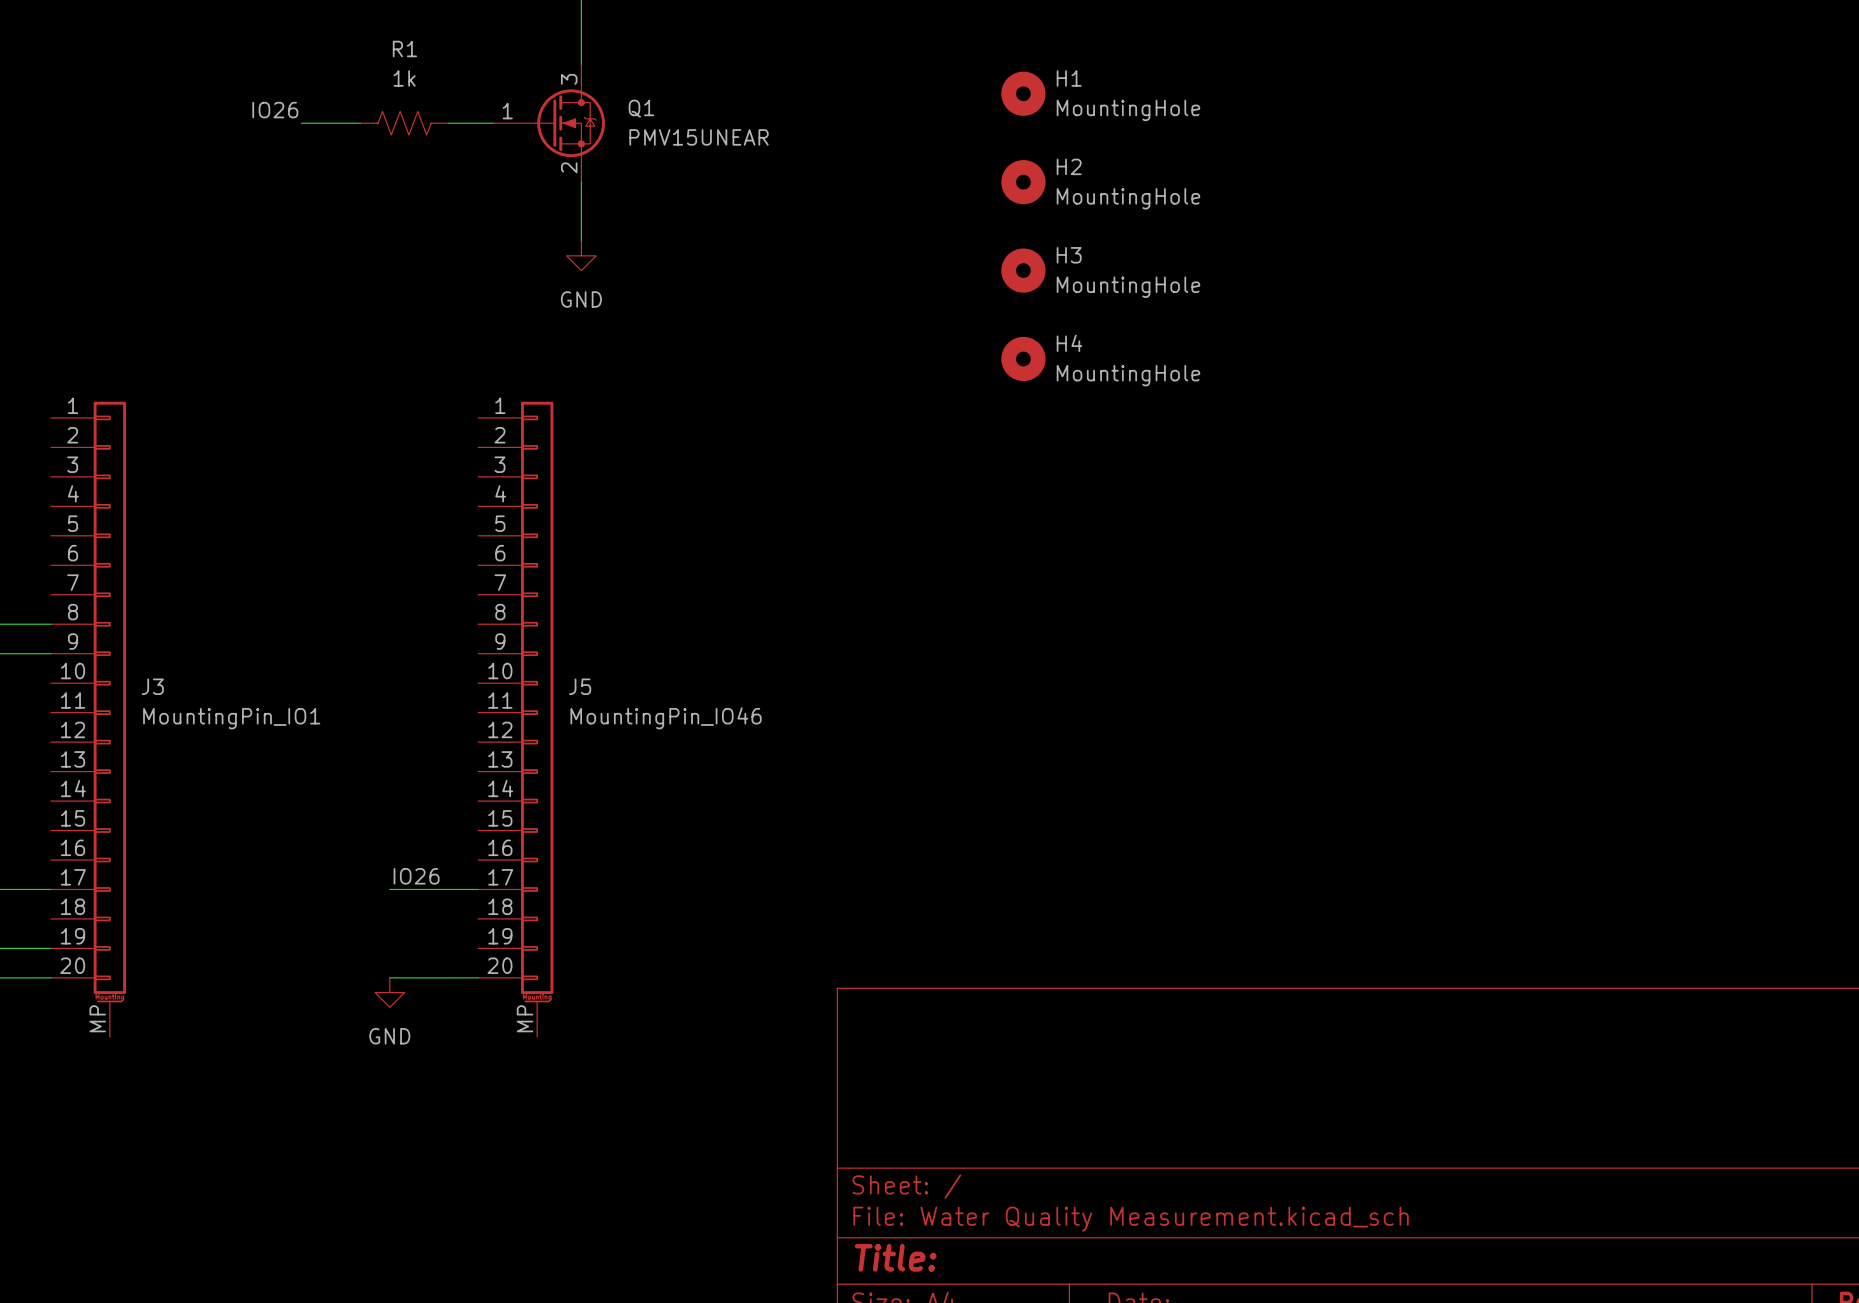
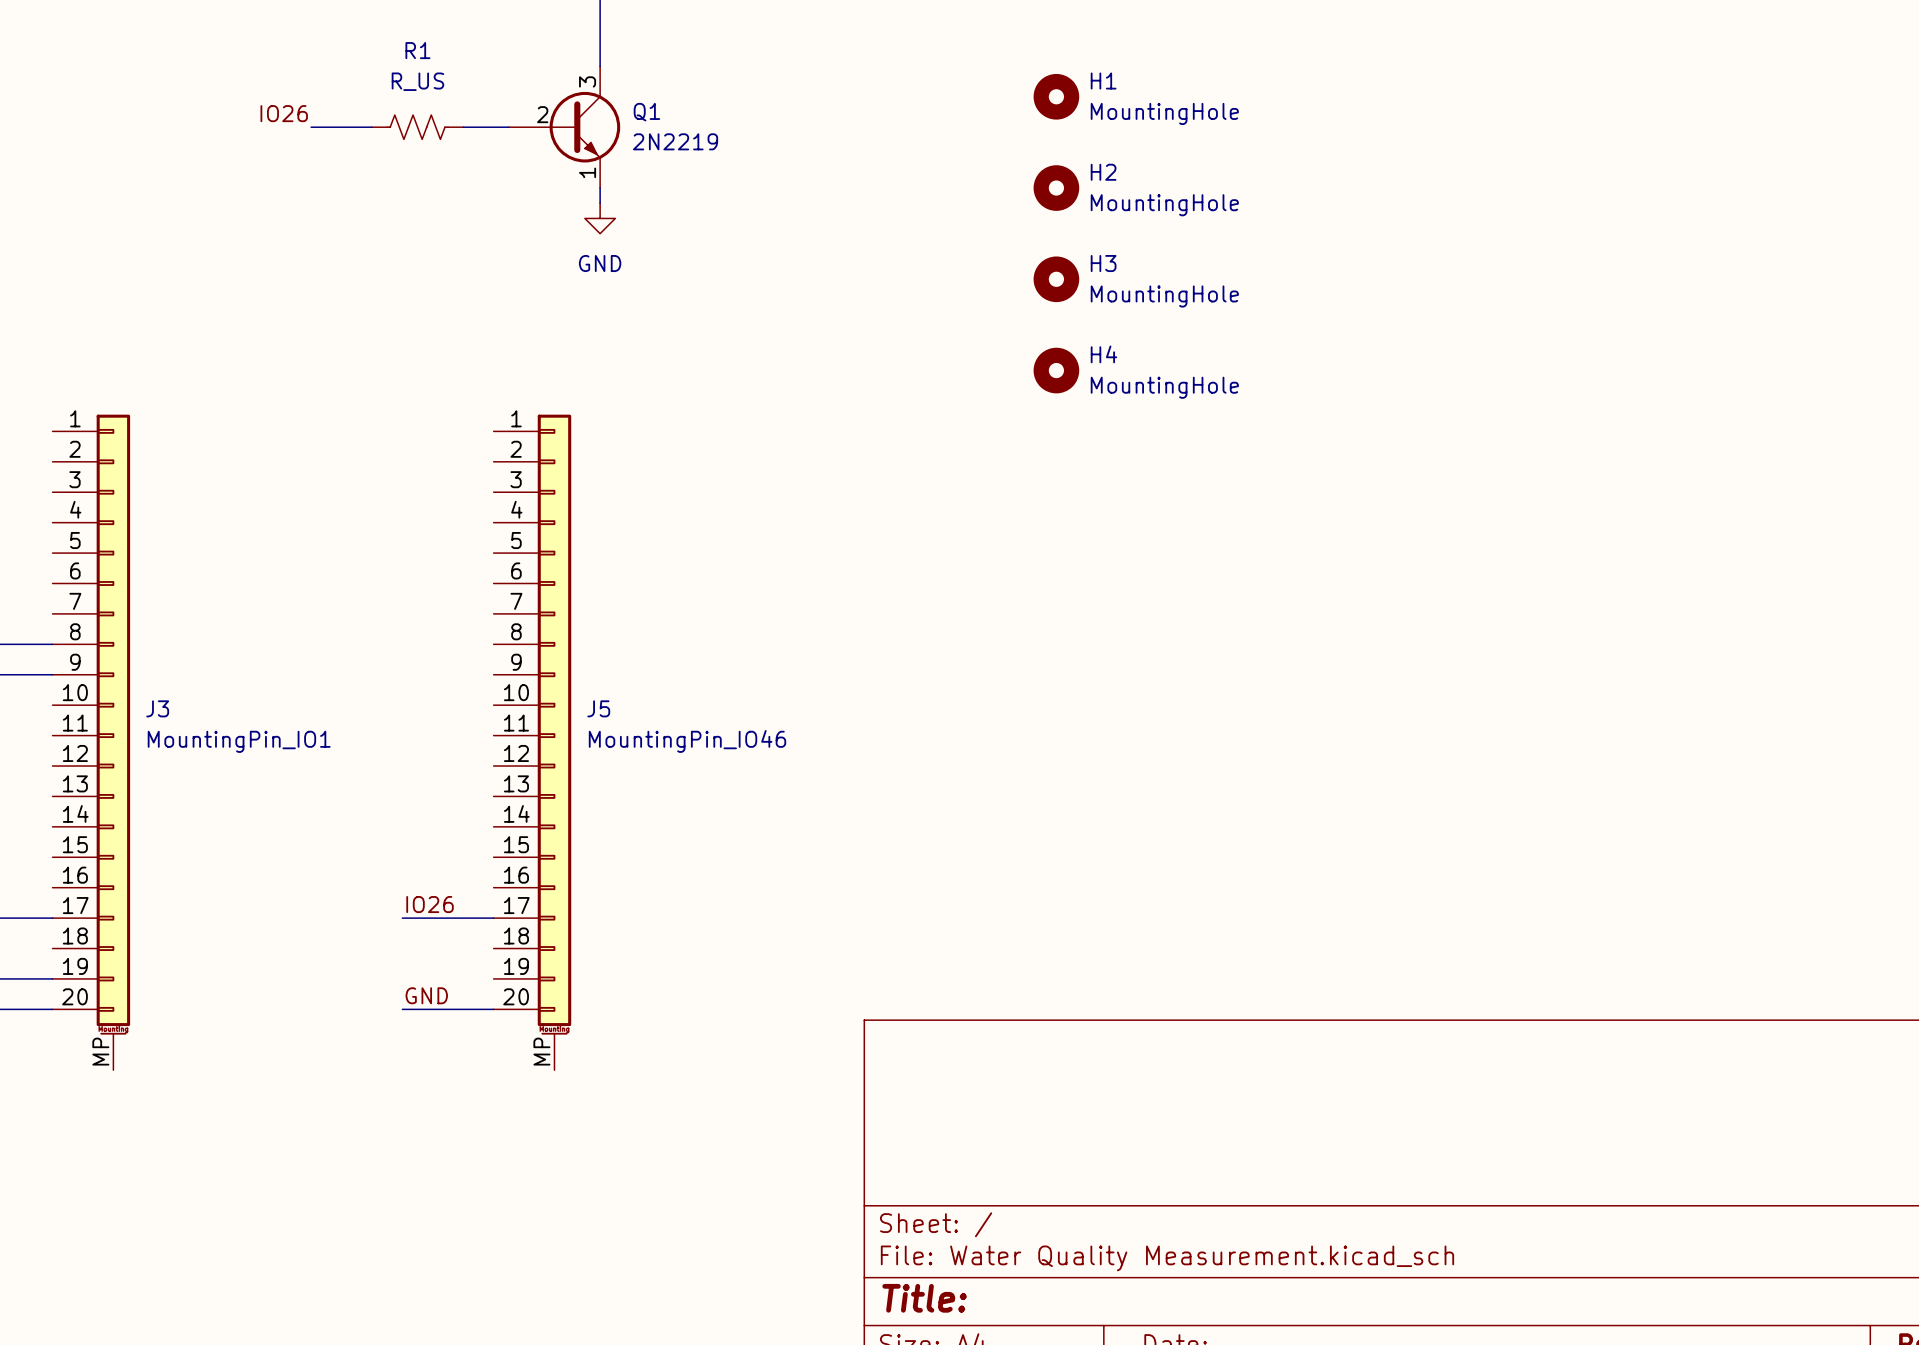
Q1 symbol: [492, 64, 605, 183] -> [508, 66, 621, 189]
R1 value: 1k (404, 78) -> R_US (417, 81)
Q1 value: PMV15UNEAR (699, 137) -> 2N2219 (675, 141)
wire: (581, 196) (581, 241) -> none
power symbol position: GND (581, 255) -> GND (600, 218)
label: none -> GND (426, 995)
power symbol: GND (389, 992) -> none

